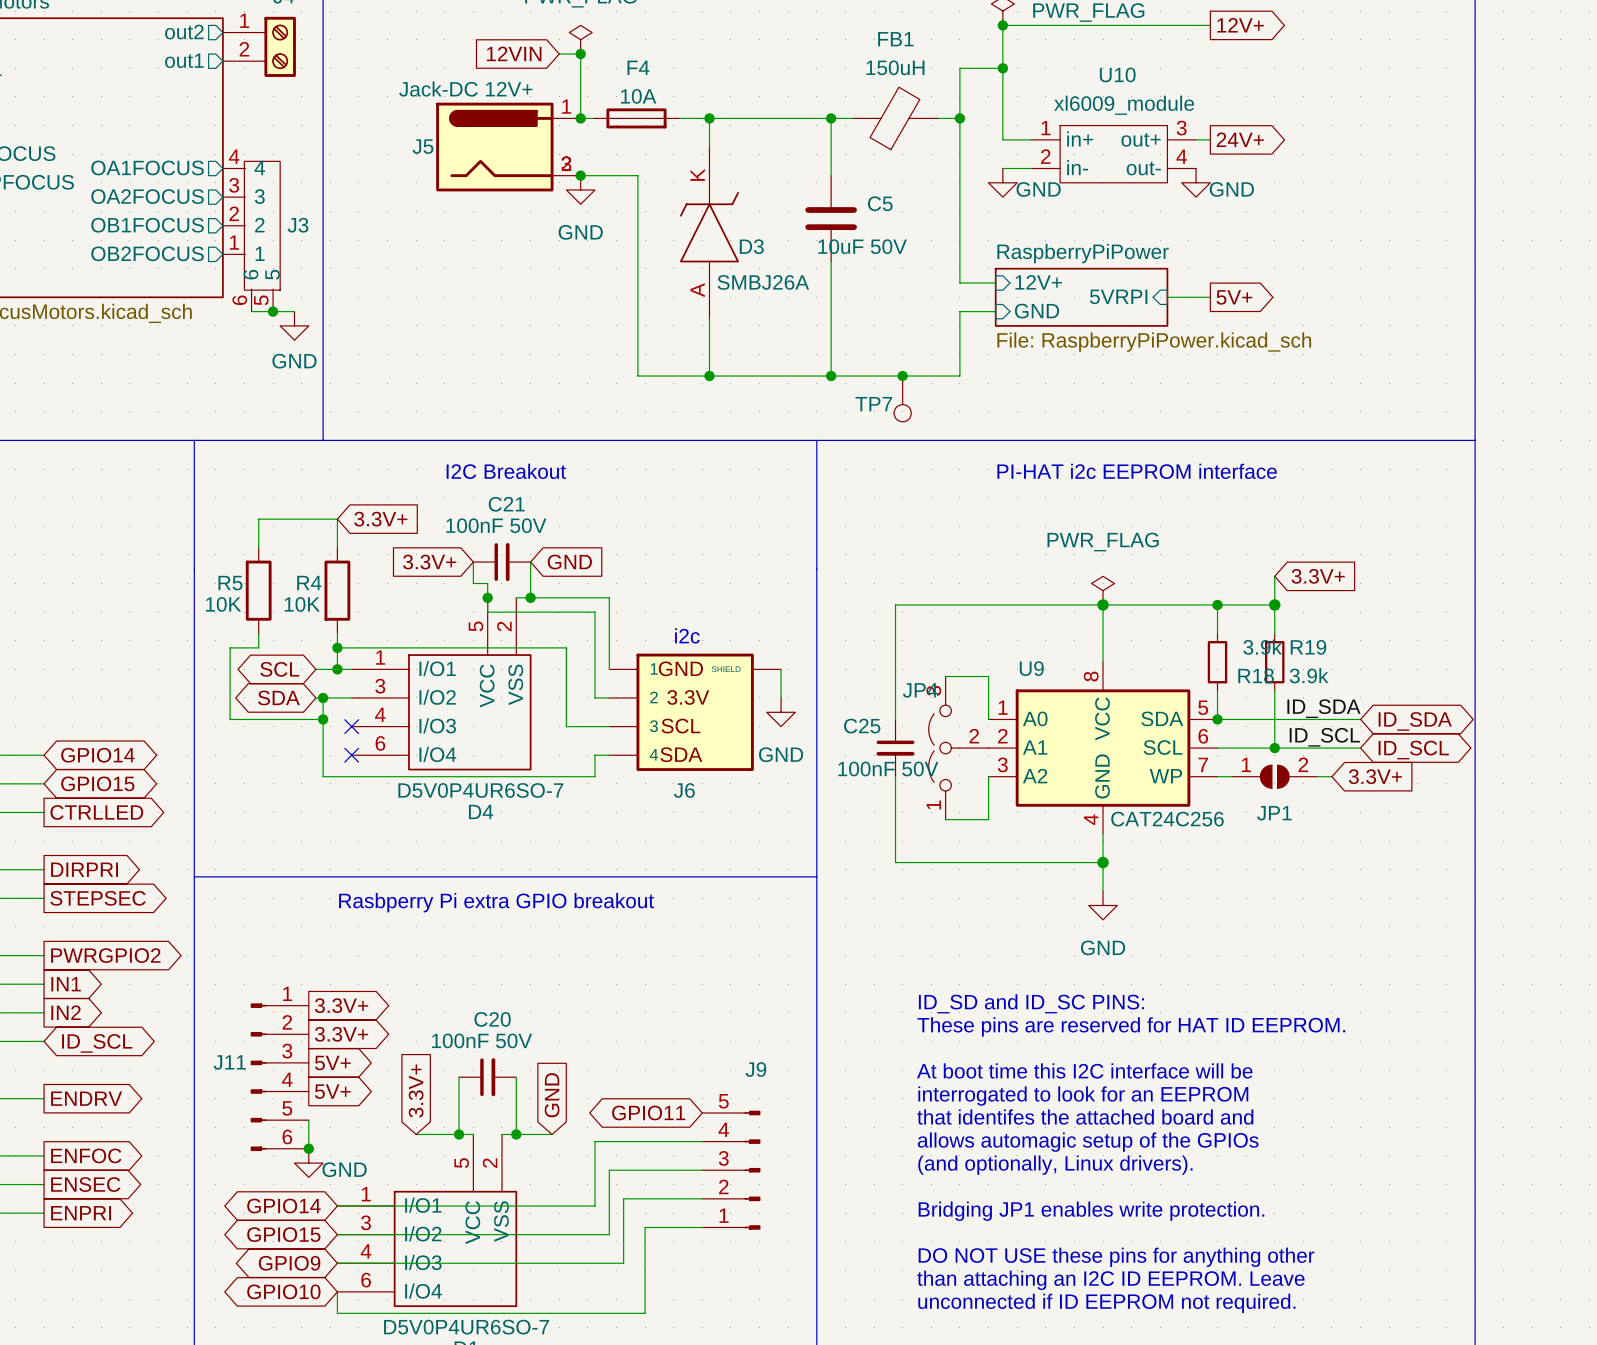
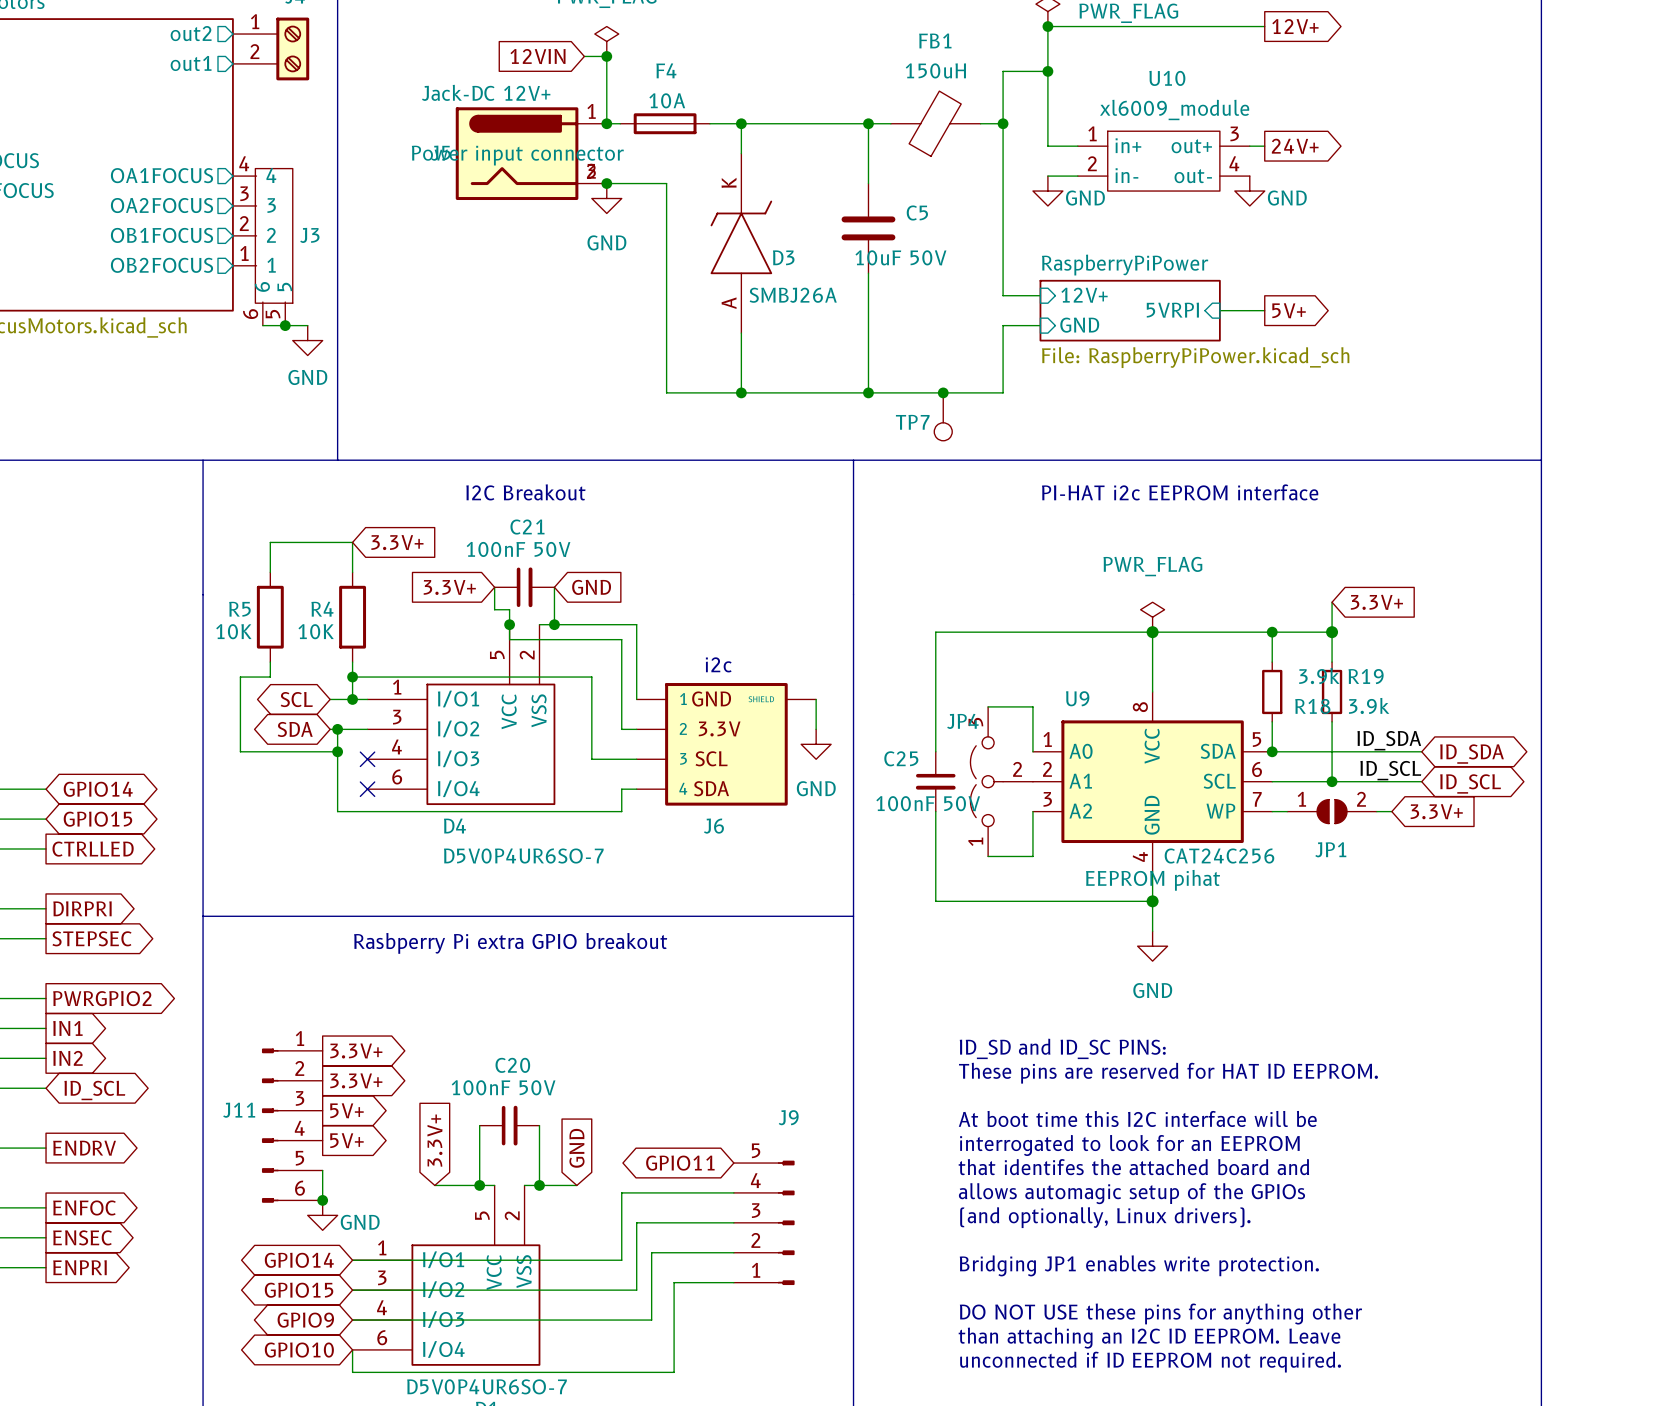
J5 text: none -> Power input connector (517, 155)
D4 value position: D5V0P4UR6SO-7 (480, 790) -> D5V0P4UR6SO-7 (523, 856)
D4 name position: D4 (481, 811) -> D4 (454, 826)
U9 text: none -> EEPROM pihat (1153, 880)

